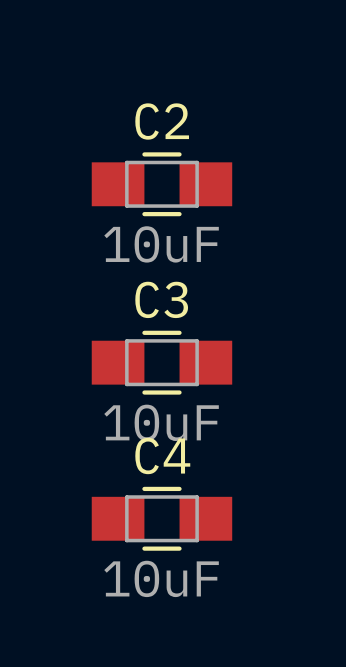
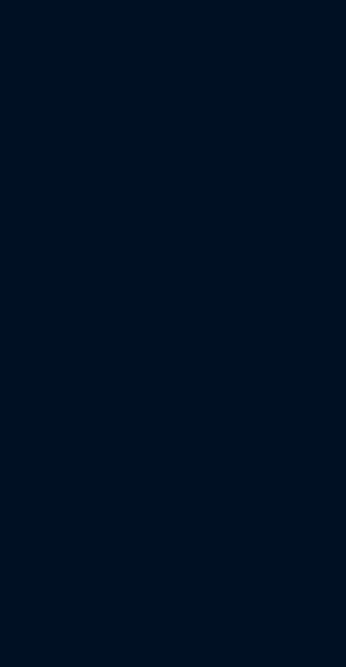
C2: 10uF (161, 184) -> none
C3: 10uF (161, 362) -> none
C4: 10uF (161, 518) -> none

